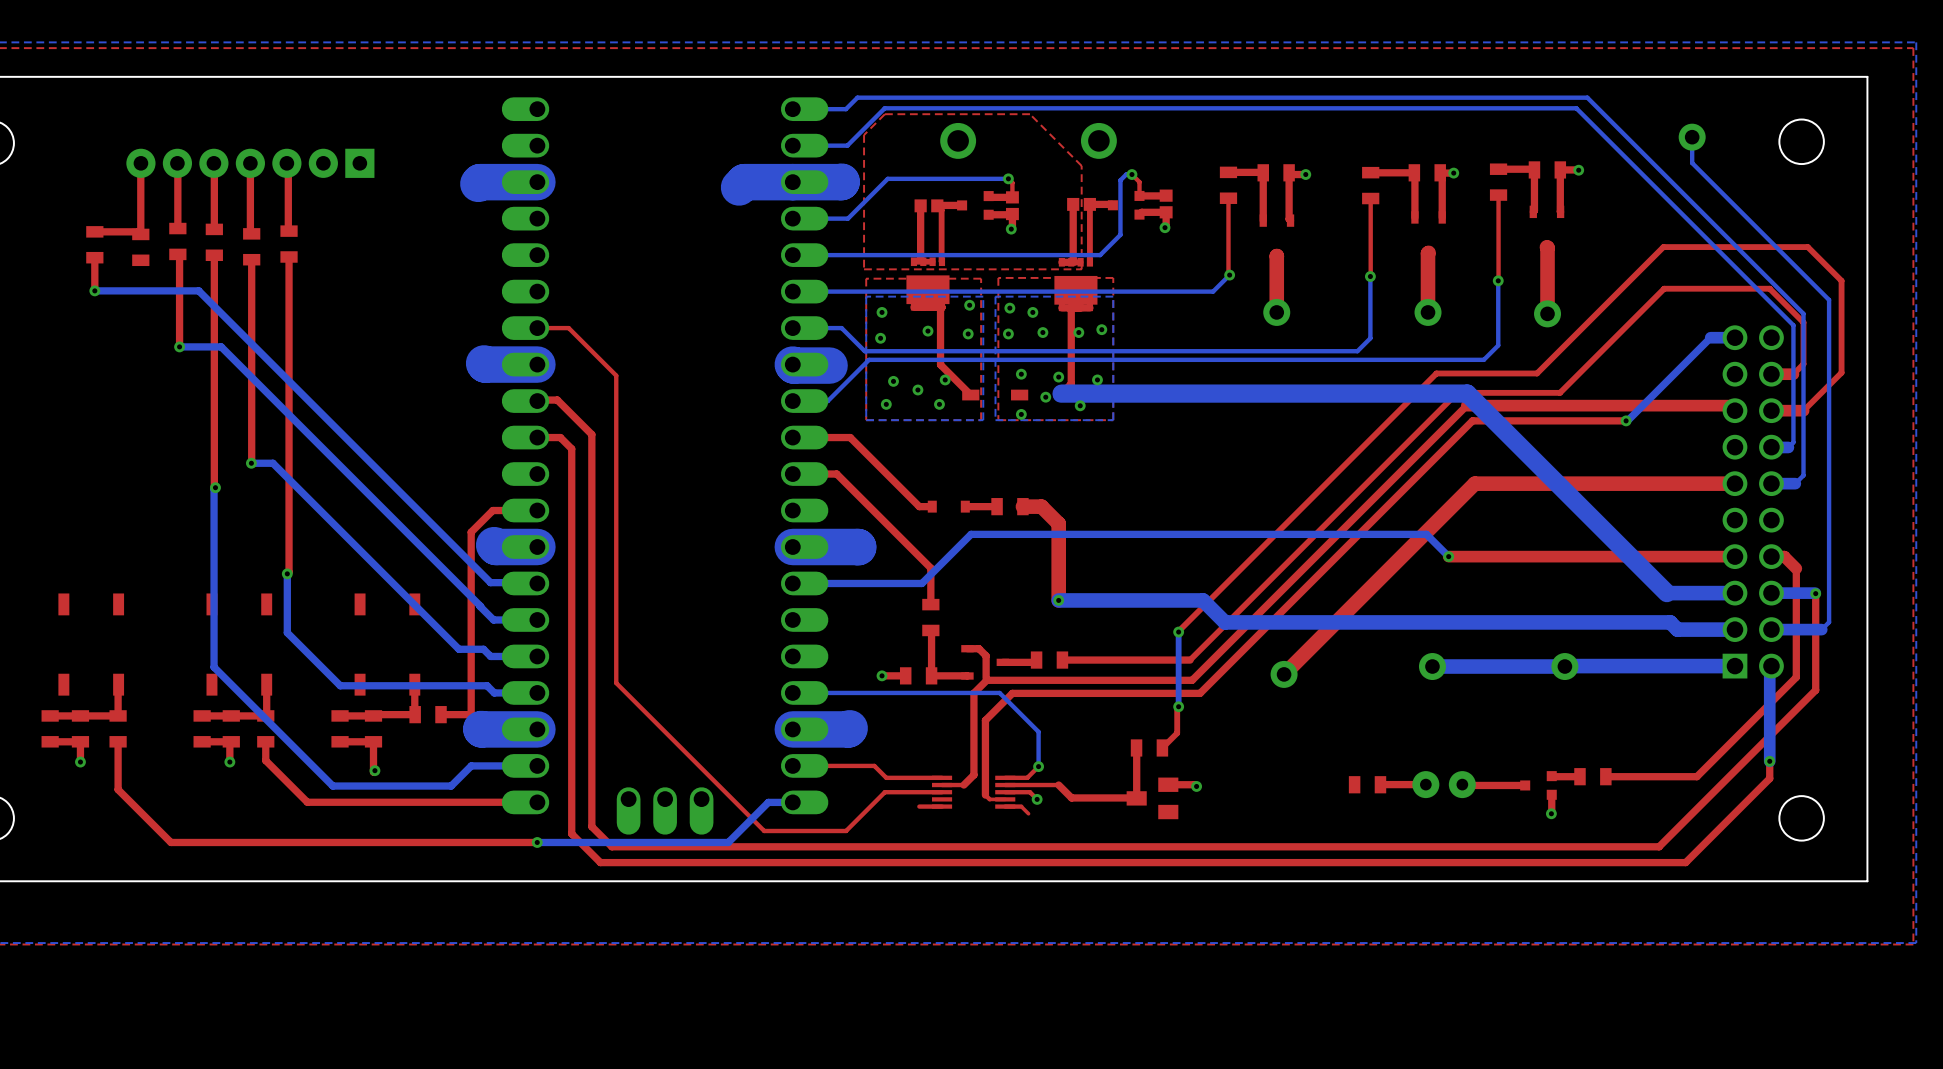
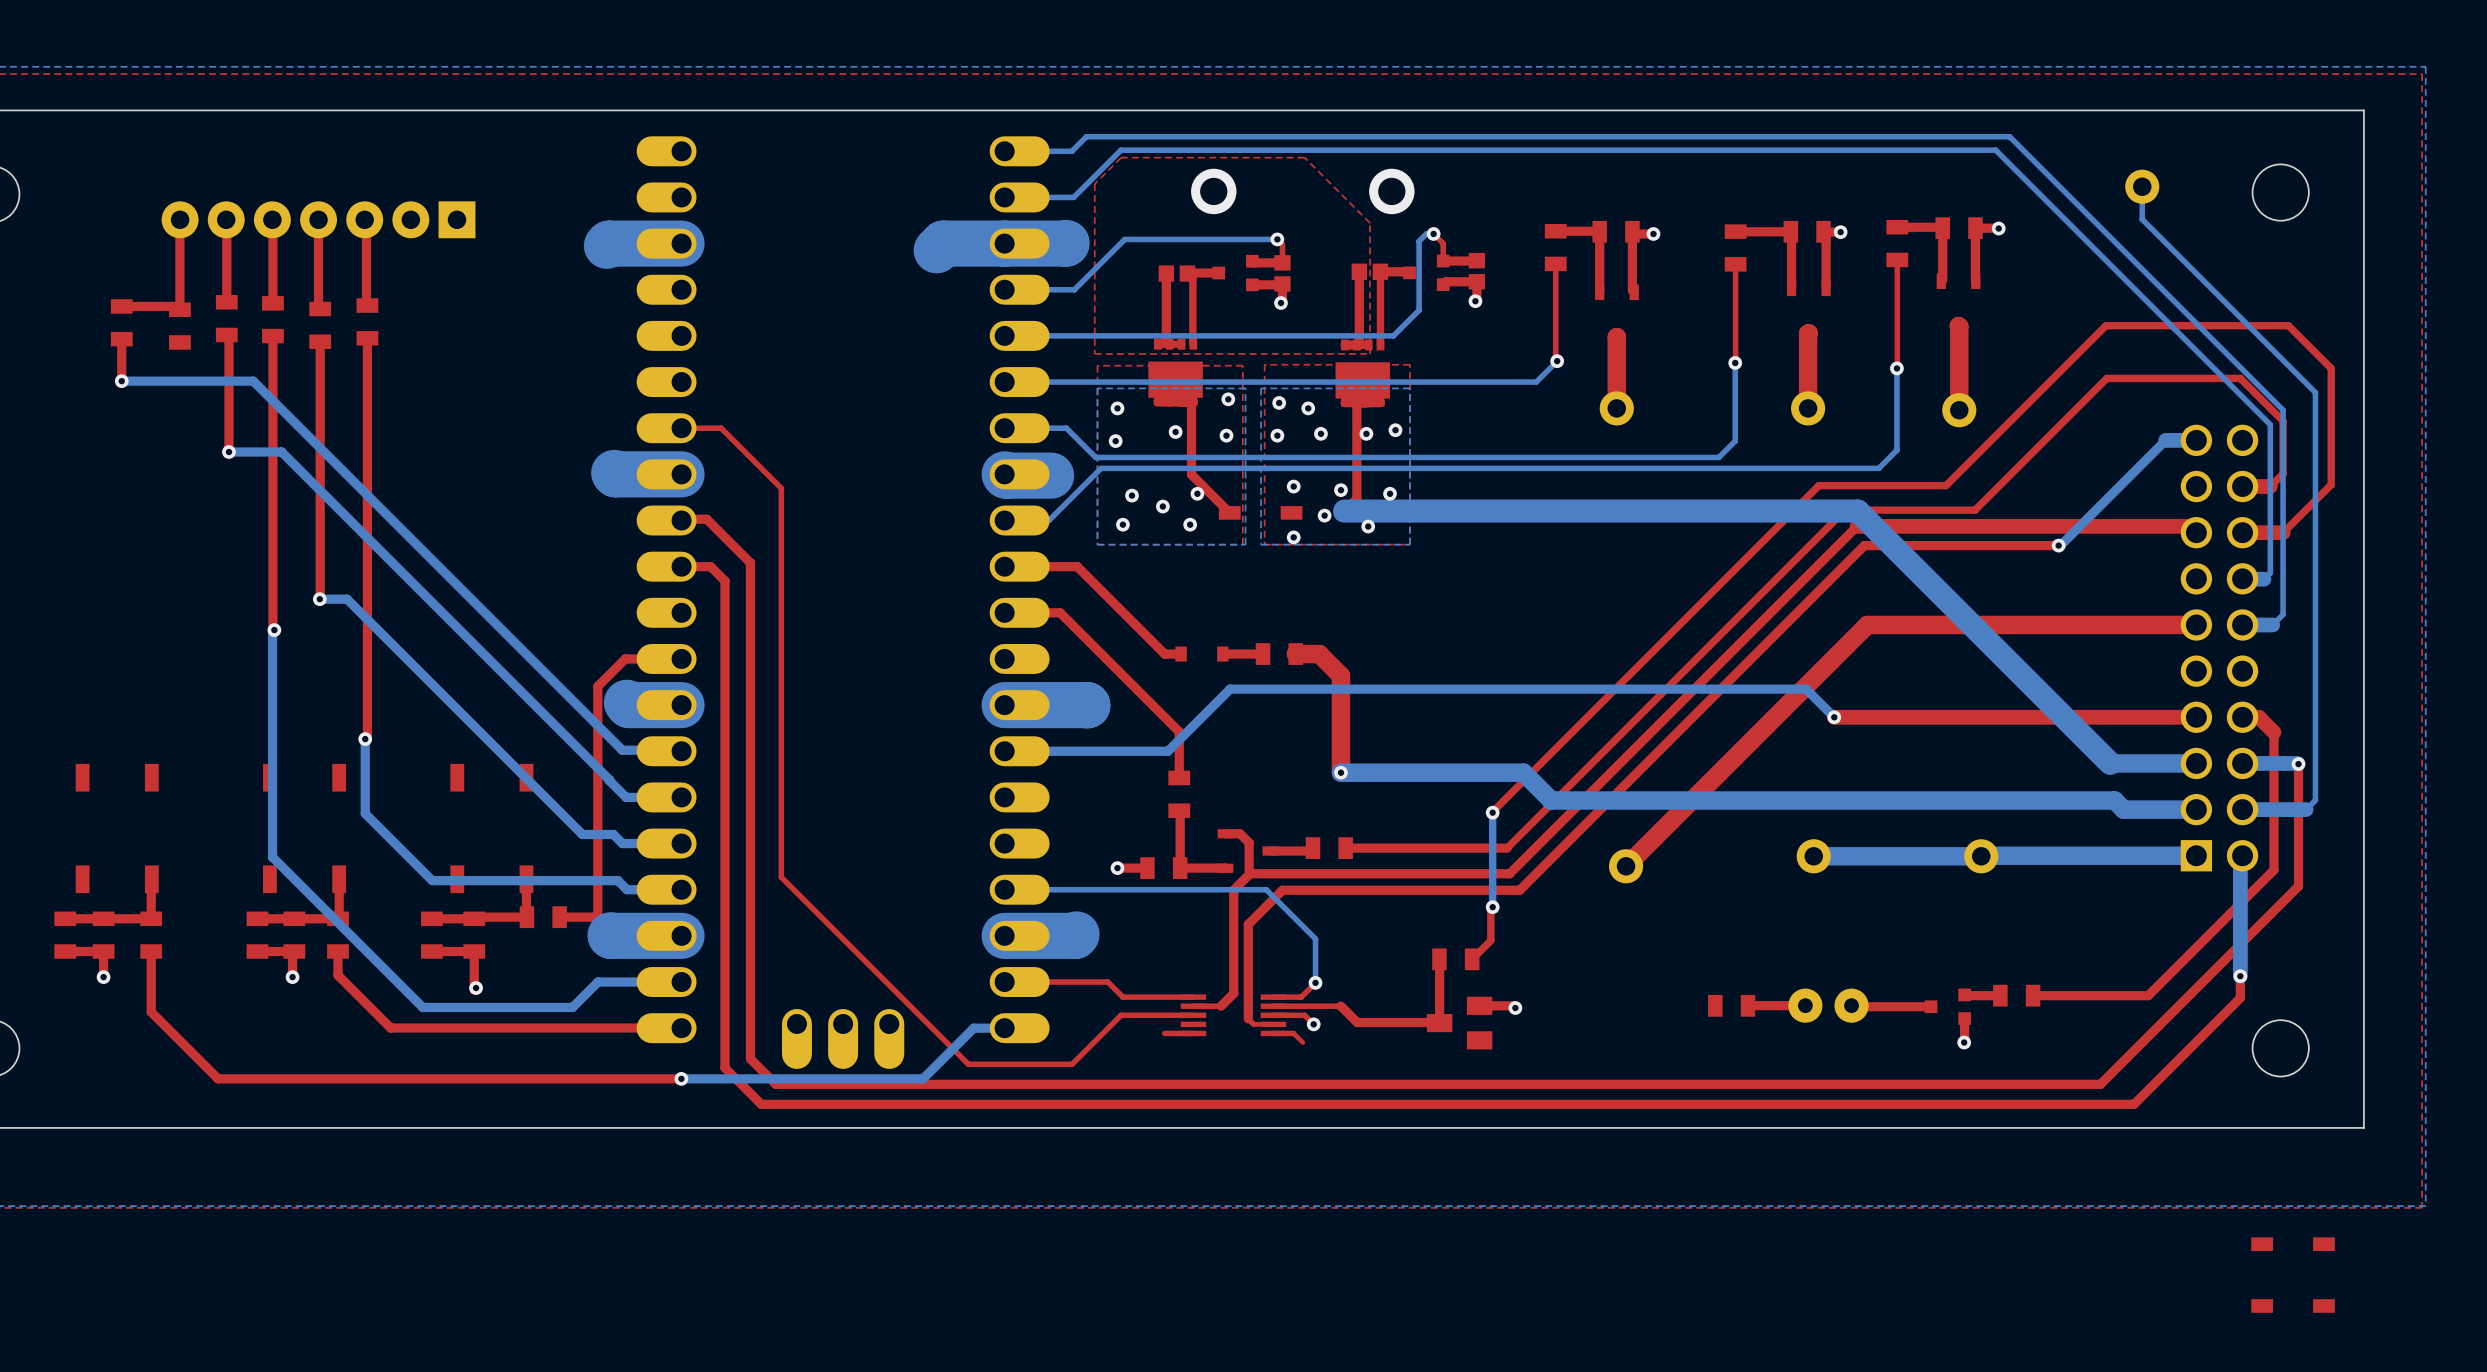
part: none -> (2293, 1244)
part: none -> (2293, 1305)

